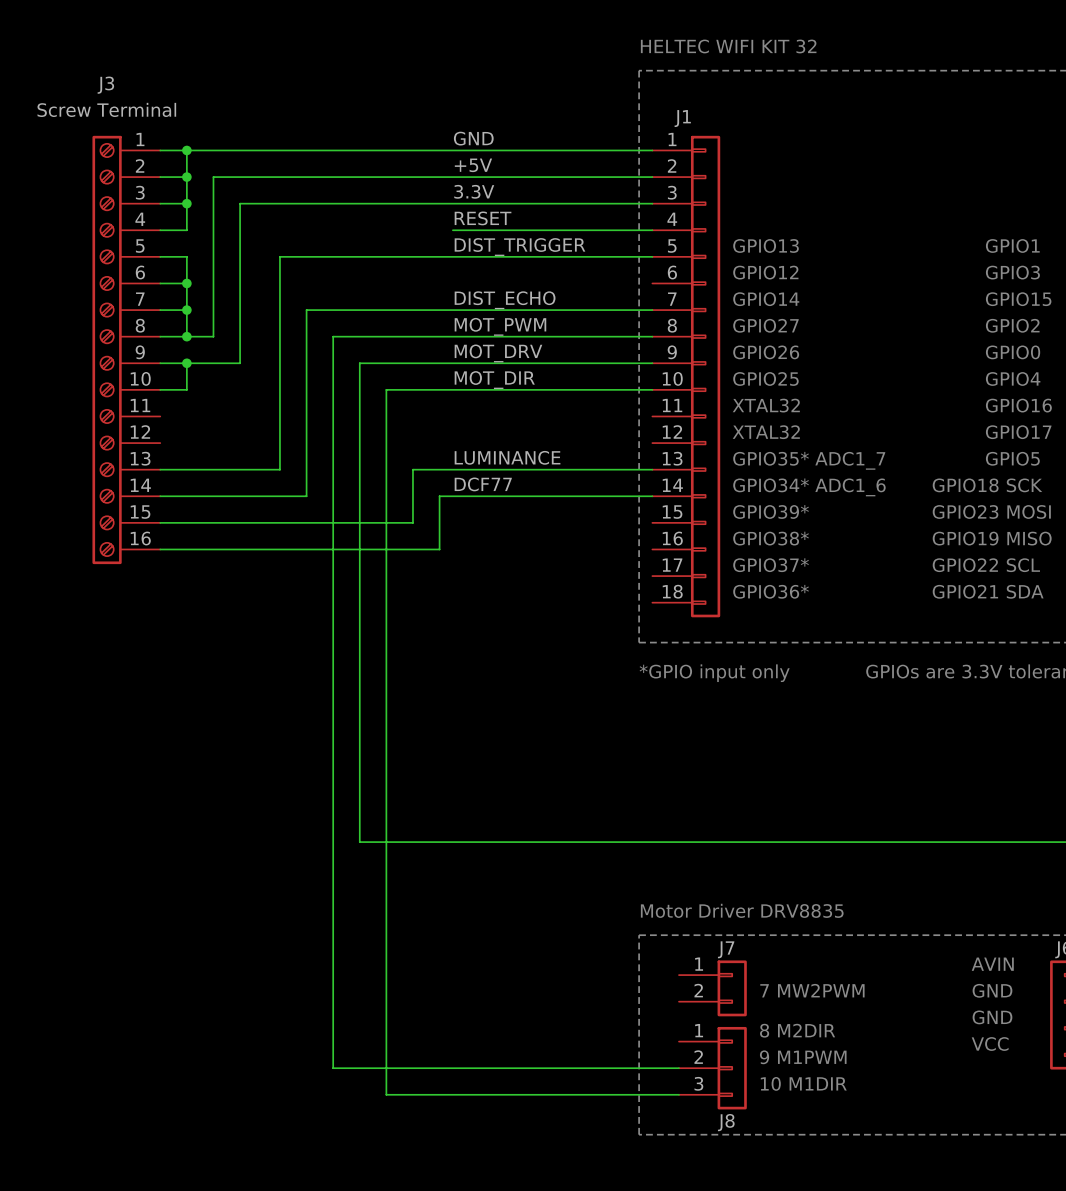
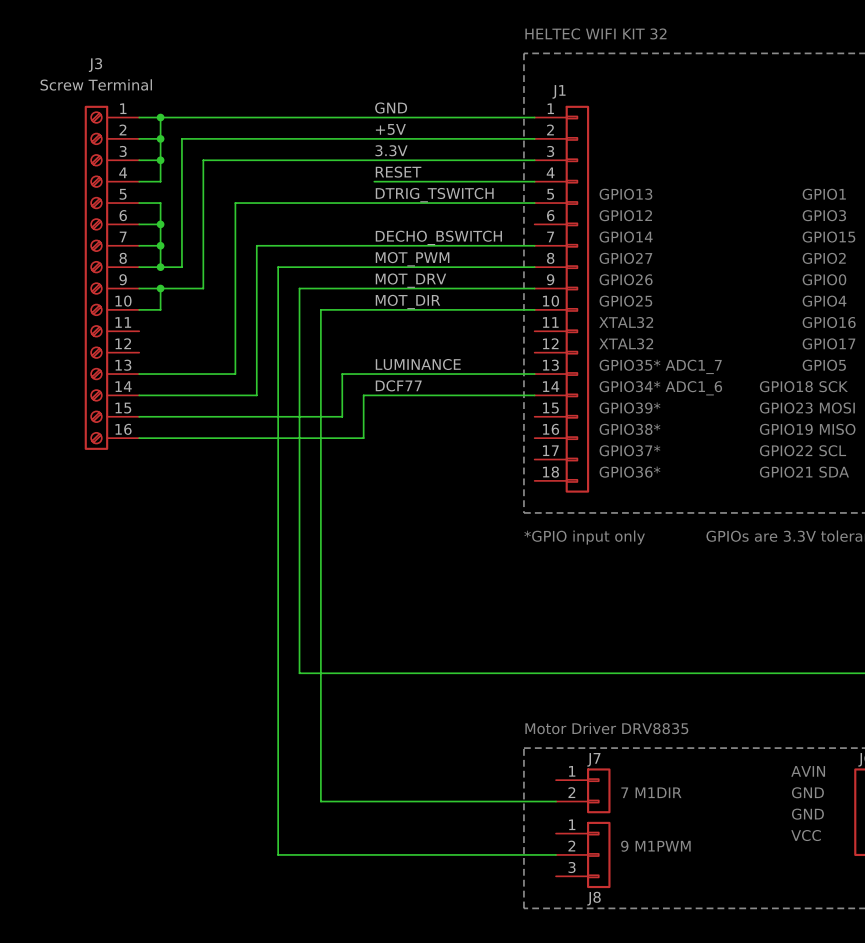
label: DIST_TRIGGER (519, 247) -> DTRIG_TSWITCH (434, 195)
label: DIST_ECHO (505, 300) -> DECHO_BSWITCH (438, 237)
text: 7 MW2PWM (812, 990) -> 7 M1DIR (651, 792)
wire: (386, 1001) (386, 1094) (678, 1094) -> (320, 801) (556, 801)
text: 8 M2DIR (797, 1030) -> none
text: 10 M1DIR (803, 1083) -> none

